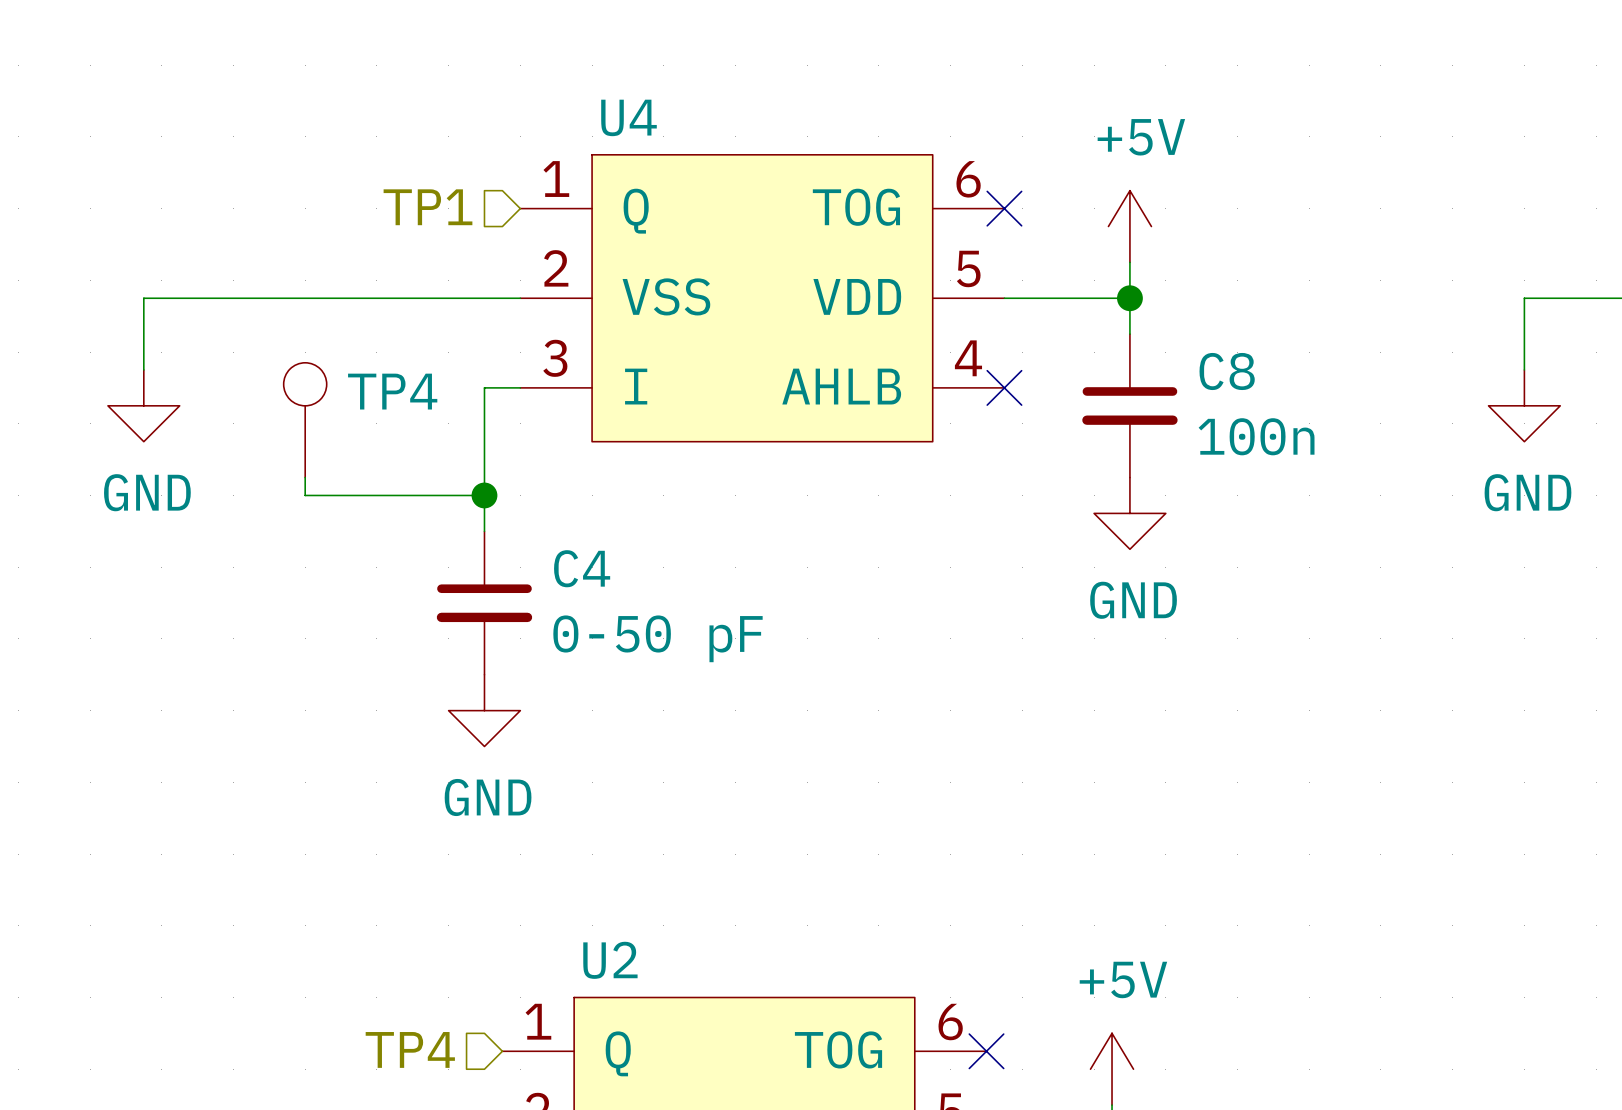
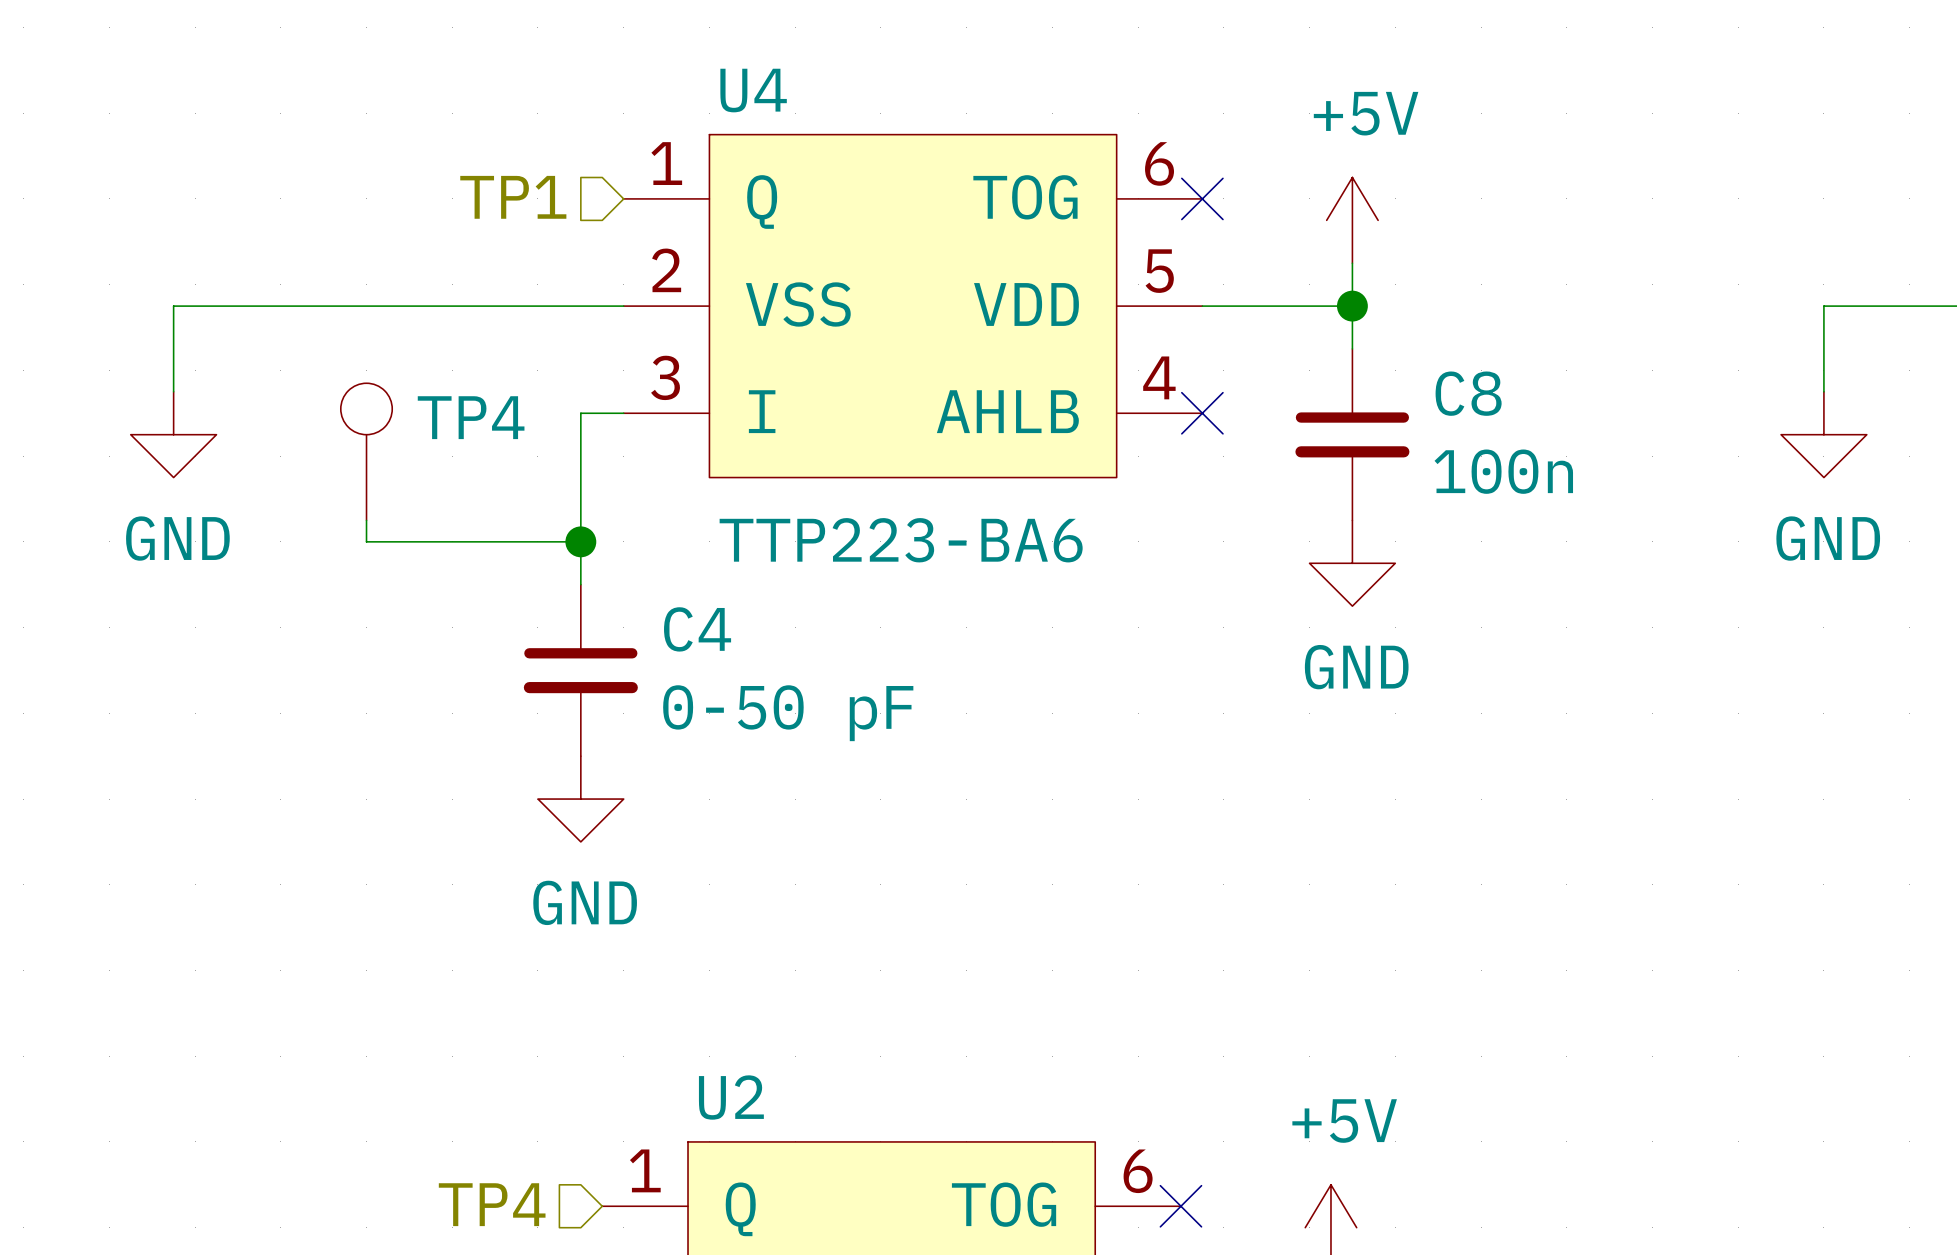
U4 value: none -> TTP223-BA6 (901, 540)

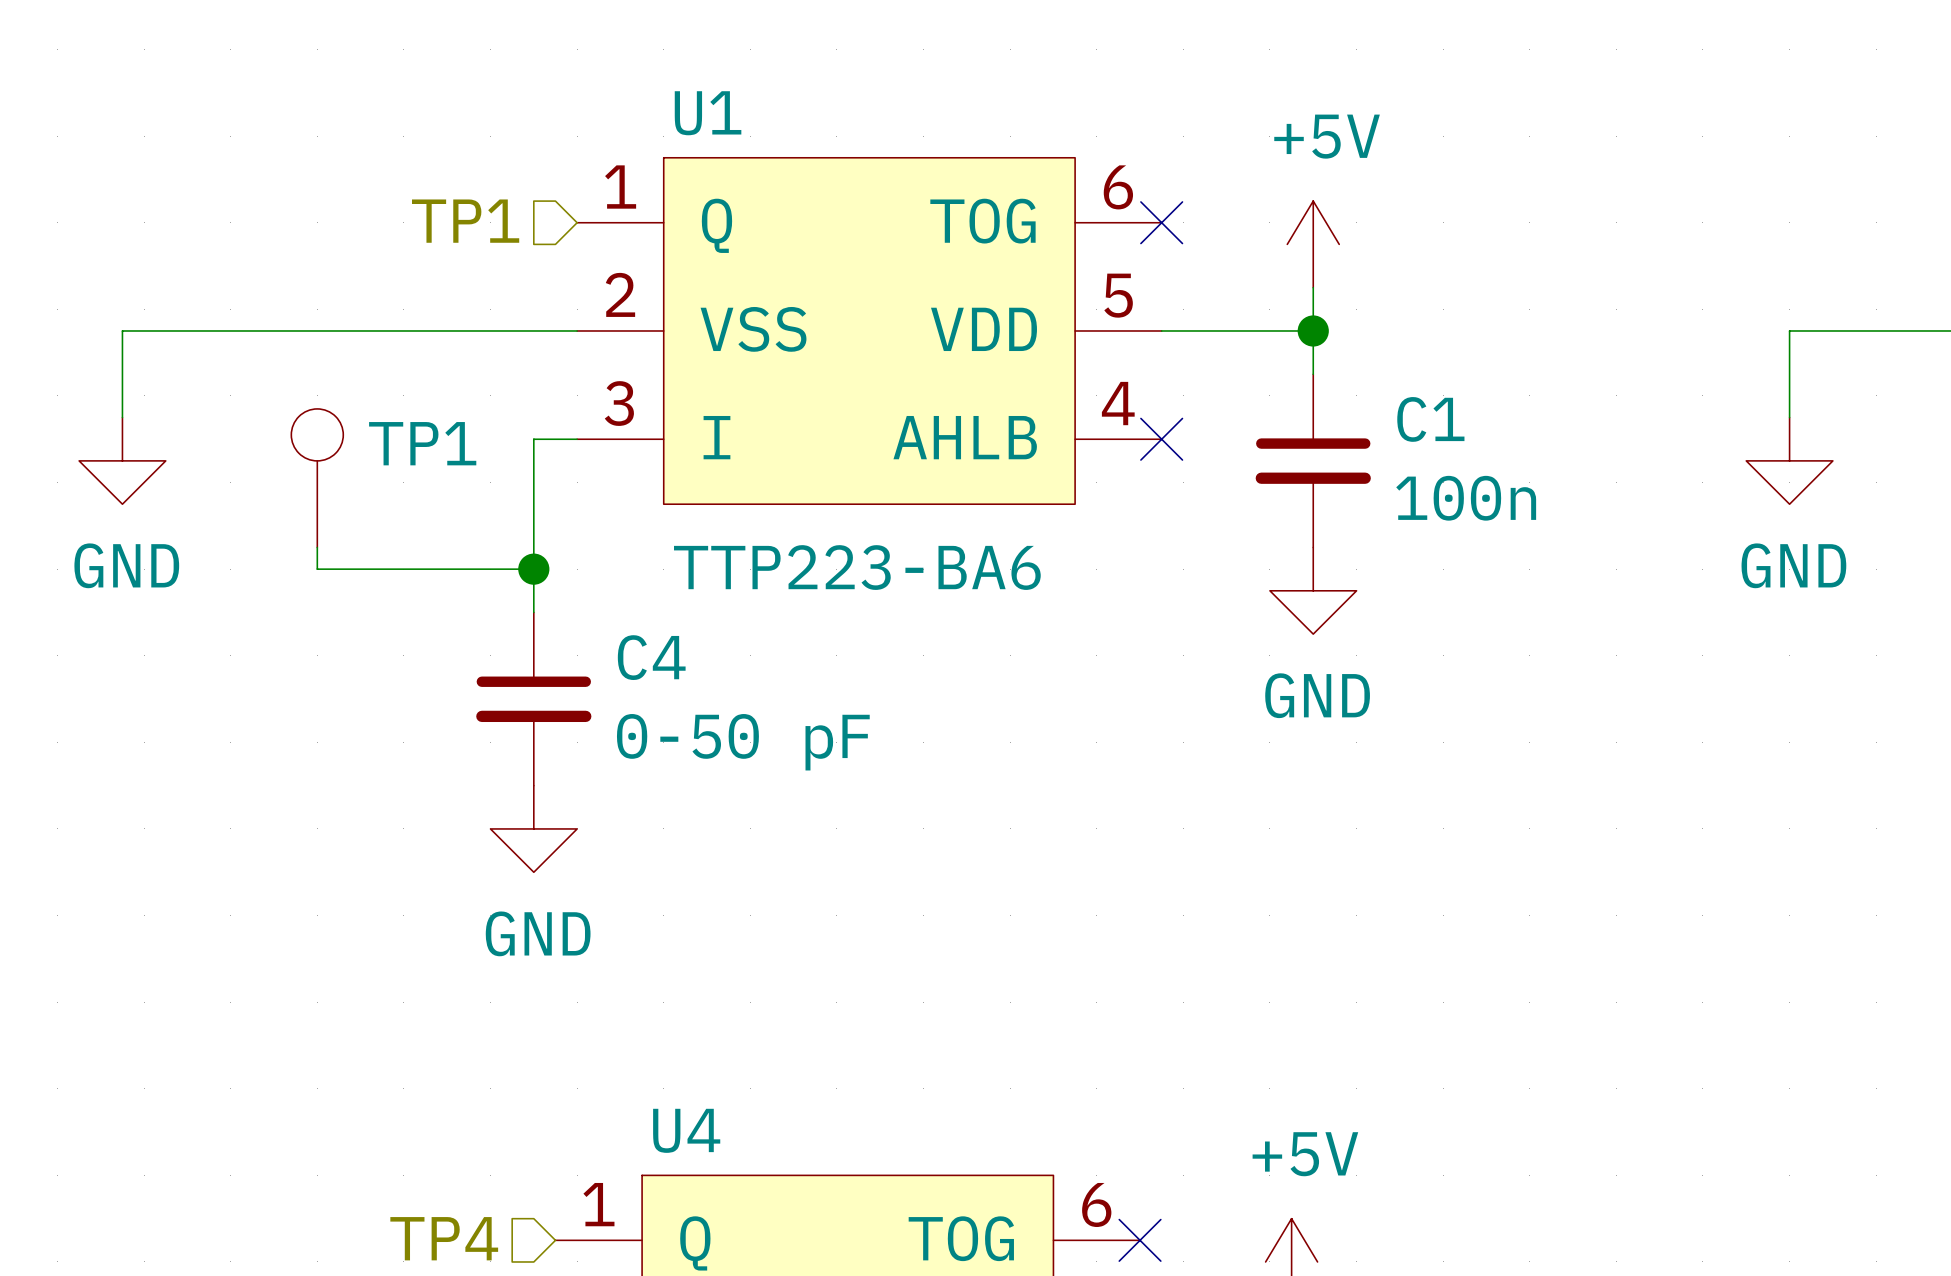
U4 name: U4 (753, 90) -> U1 (708, 113)
C8 name: C8 (1468, 393) -> C1 (1430, 419)
TP4 name: TP4 (471, 417) -> TP1 (422, 443)
U2 name: U2 (731, 1097) -> U4 (686, 1130)

